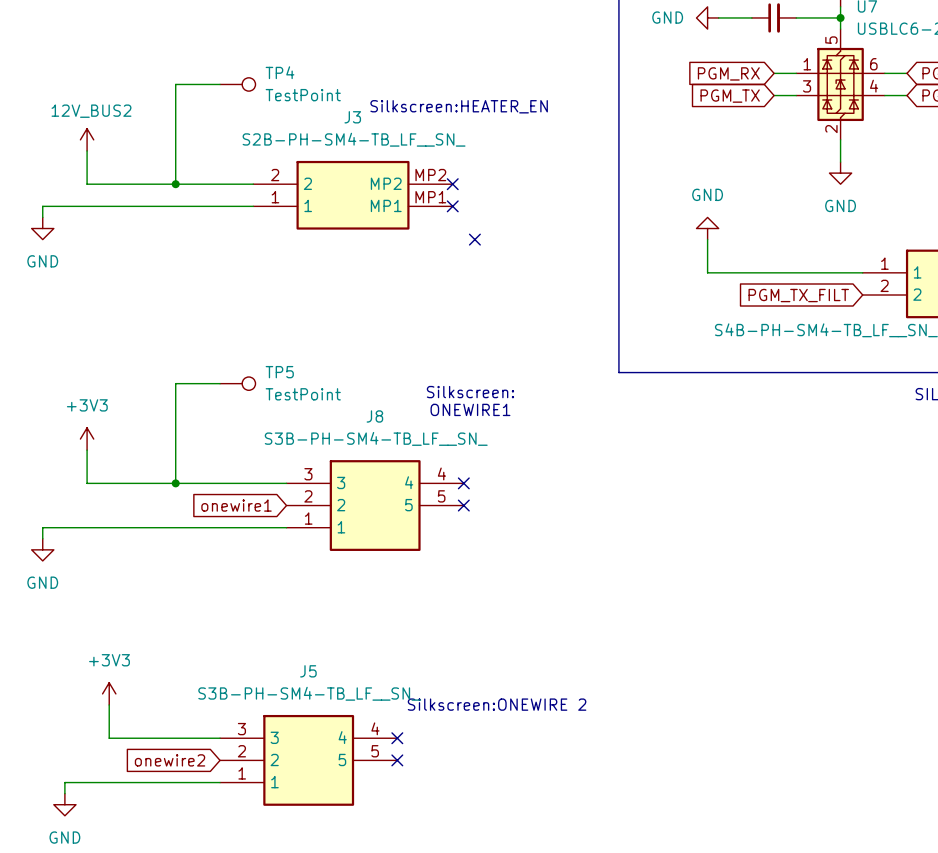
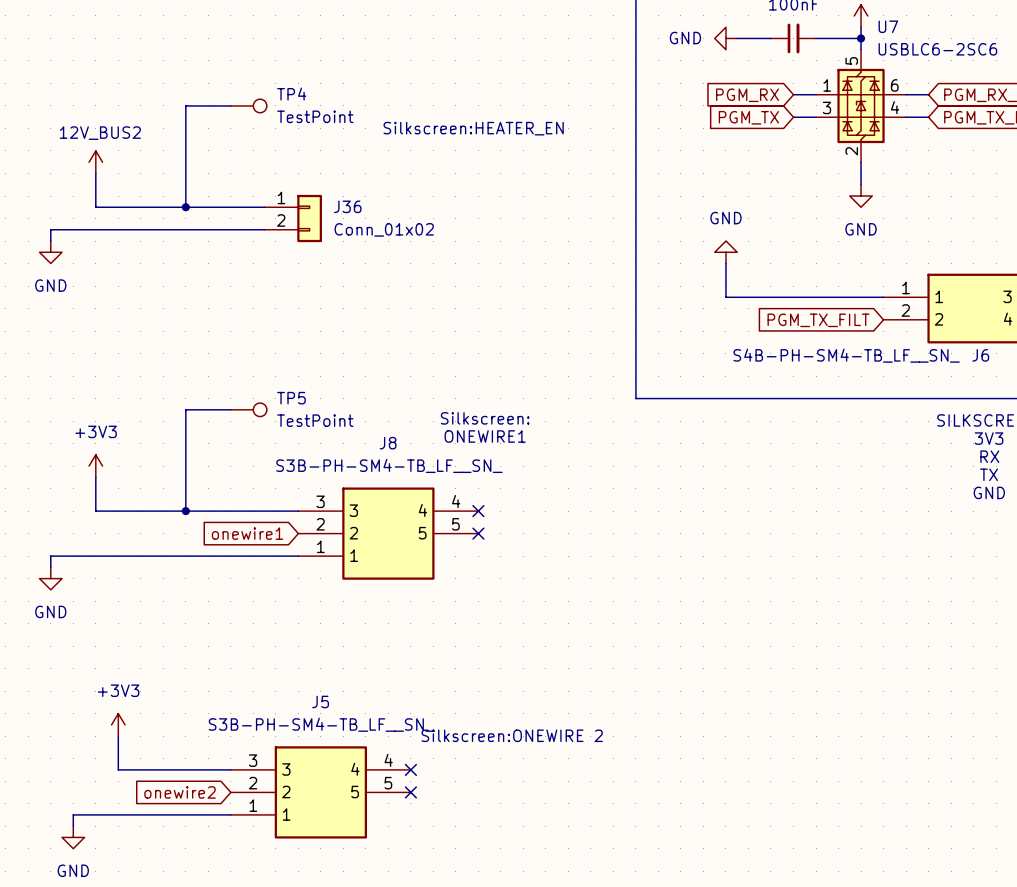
no-connect mark: (452, 184) -> none
J36: none -> Conn_01x02 (293, 218)
J3: S2B-PH-SM4-TB_LF__SN_ (353, 195) -> none
no-connect mark: (452, 206) -> none
no-connect mark: (474, 239) -> none

